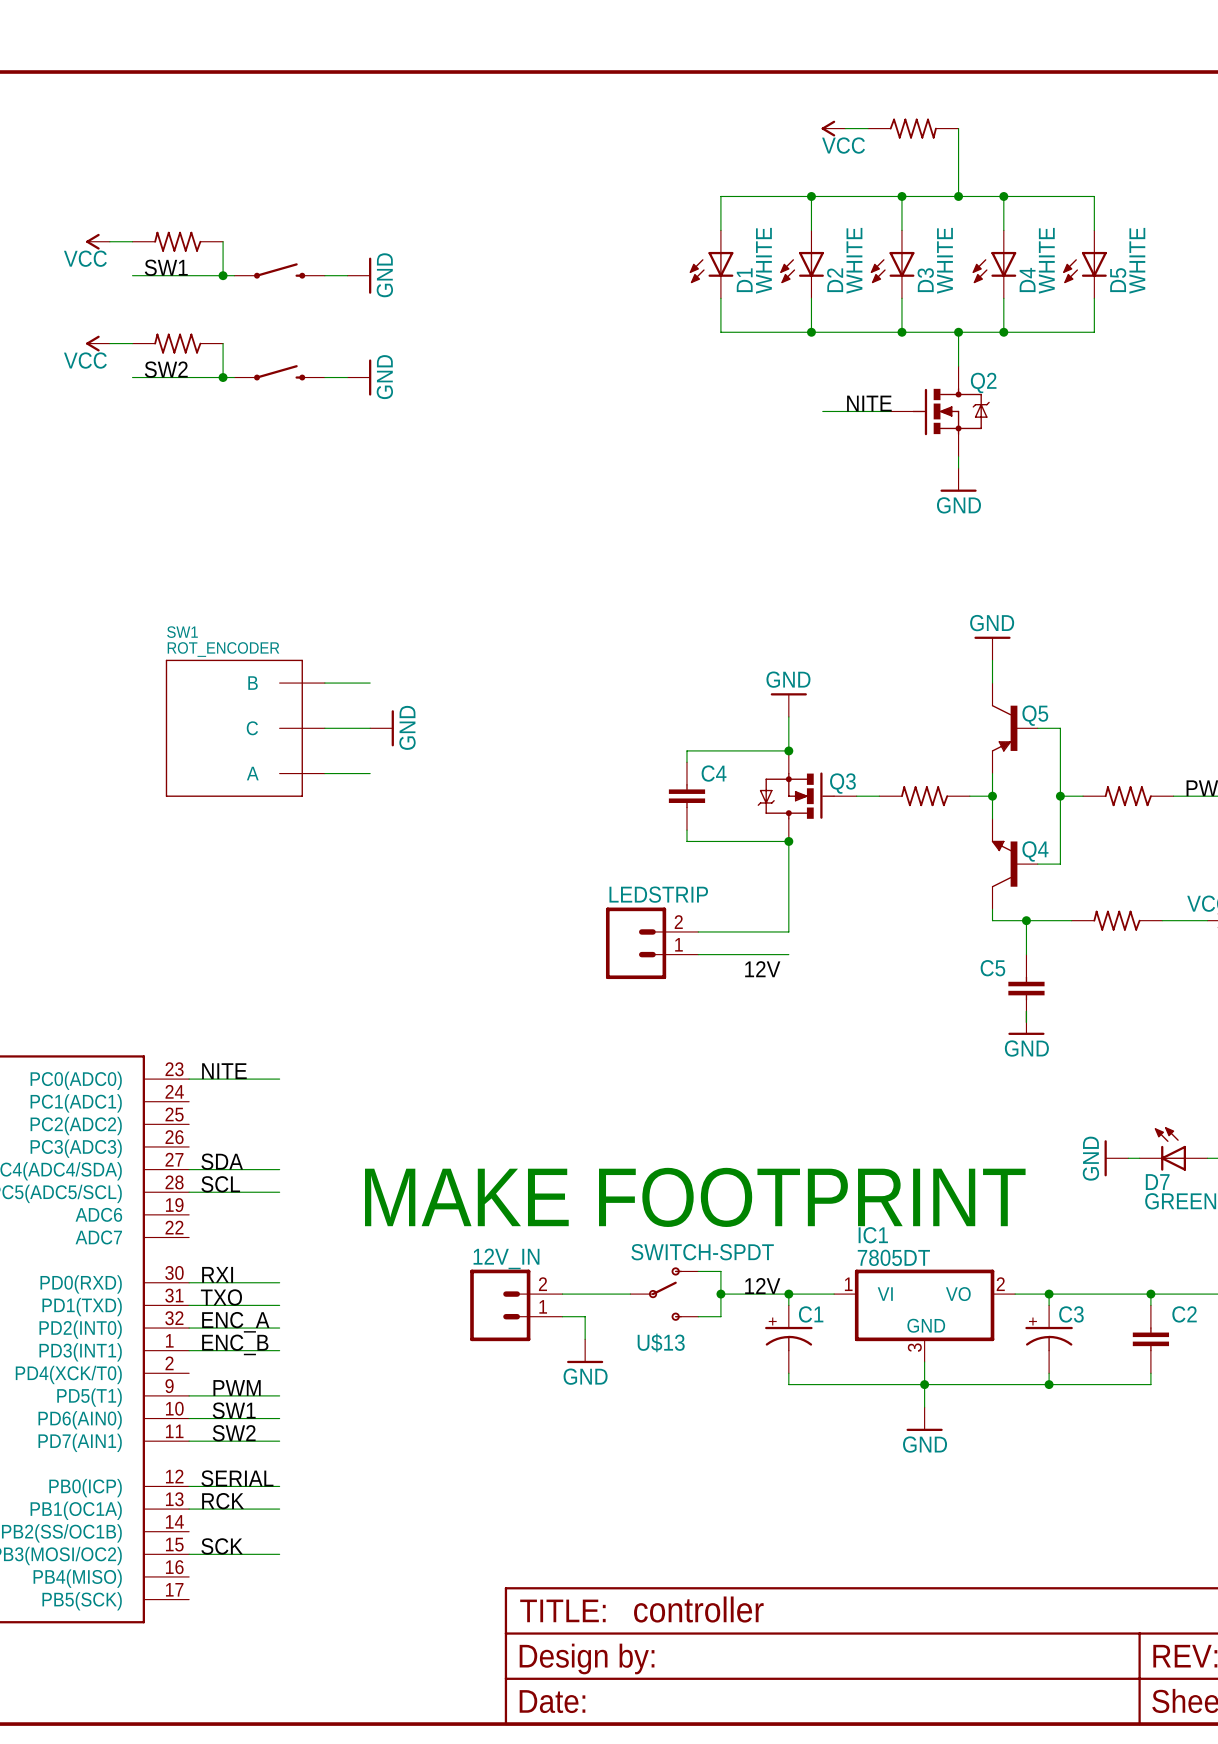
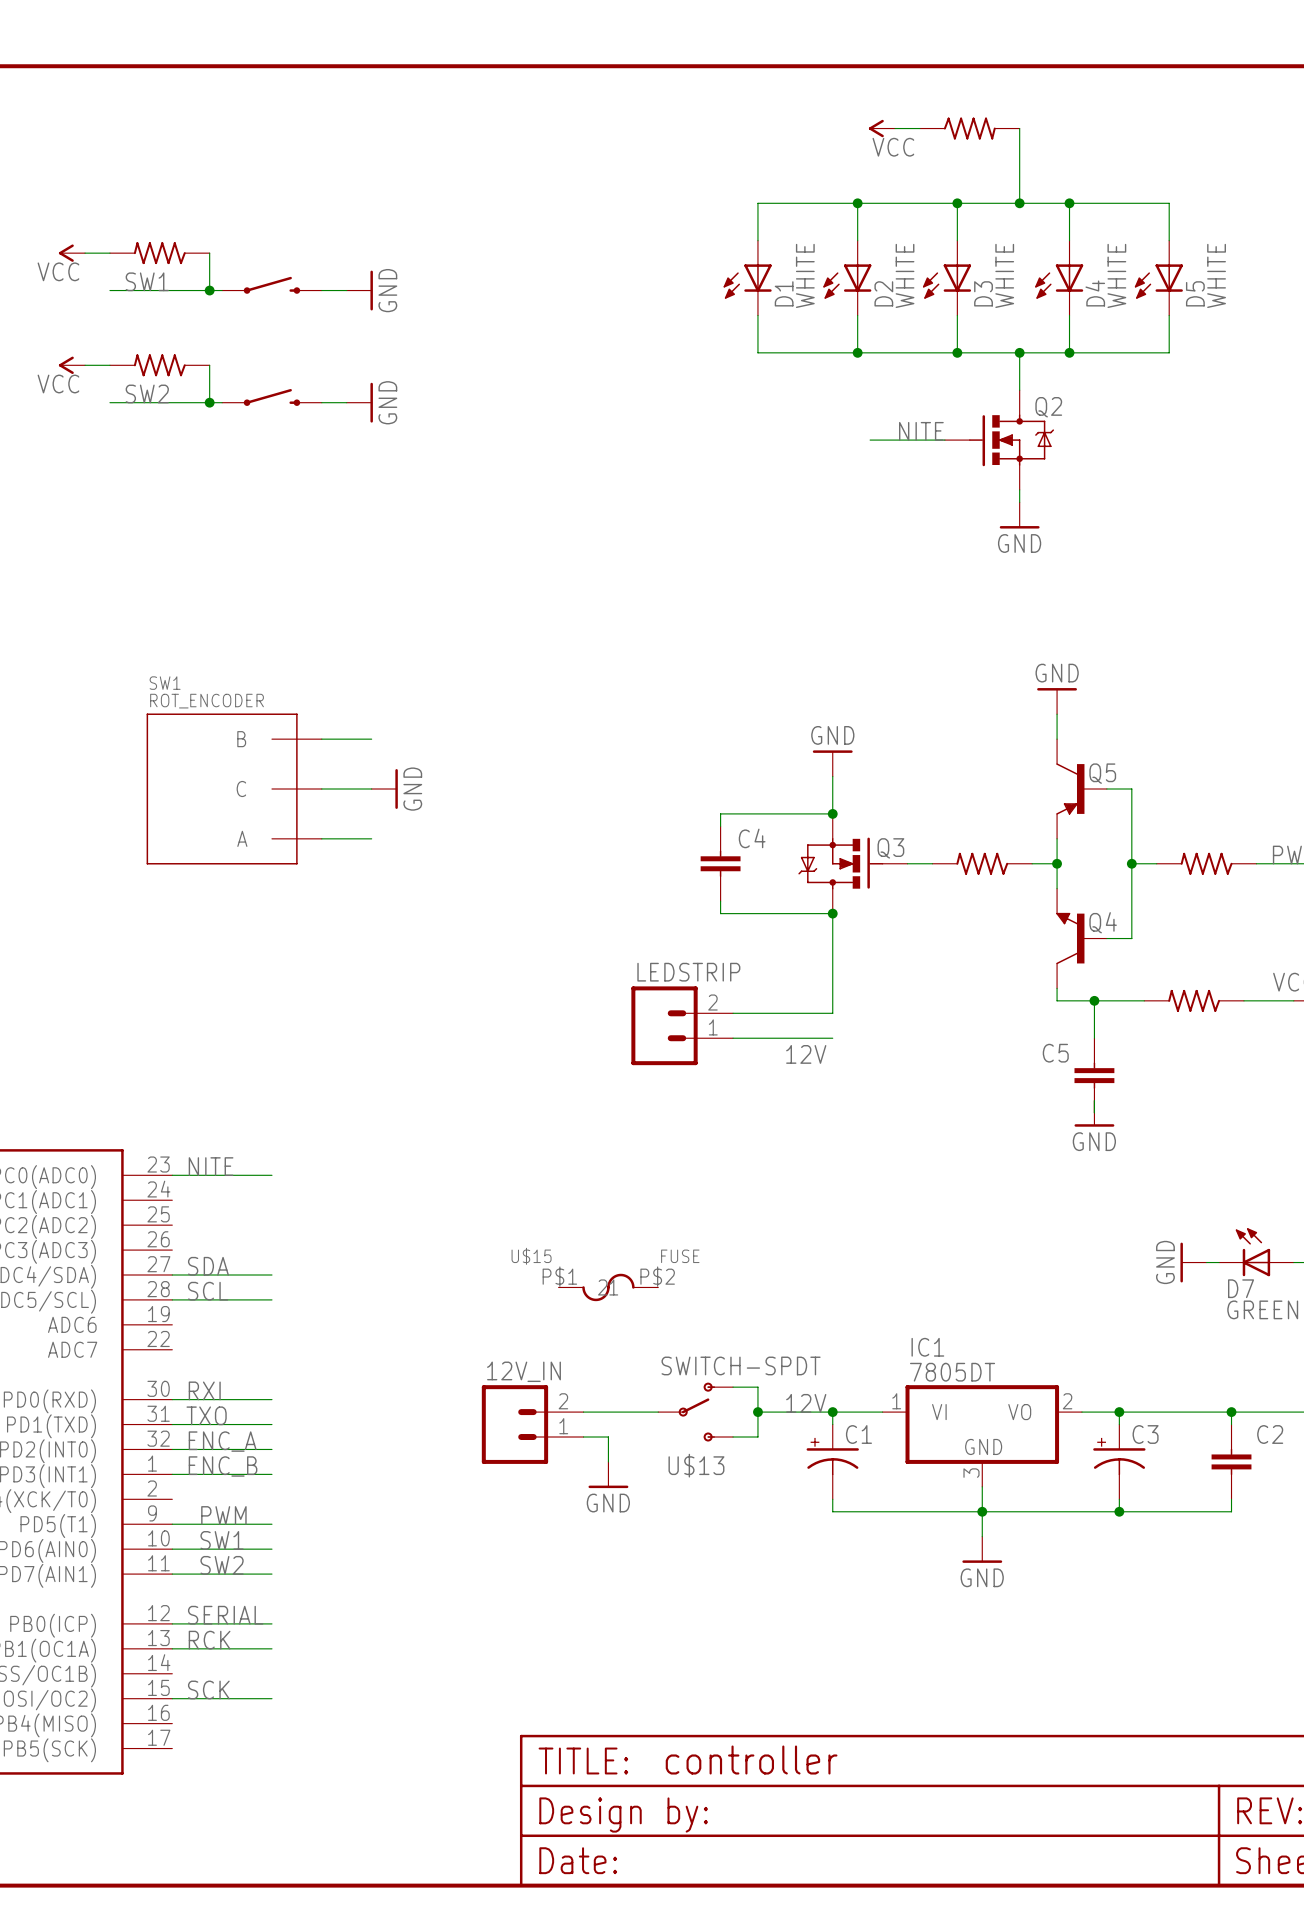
U$15: none -> FUSE (608, 1287)
text: MAKE FOOTPRINT (695, 1197) -> none

